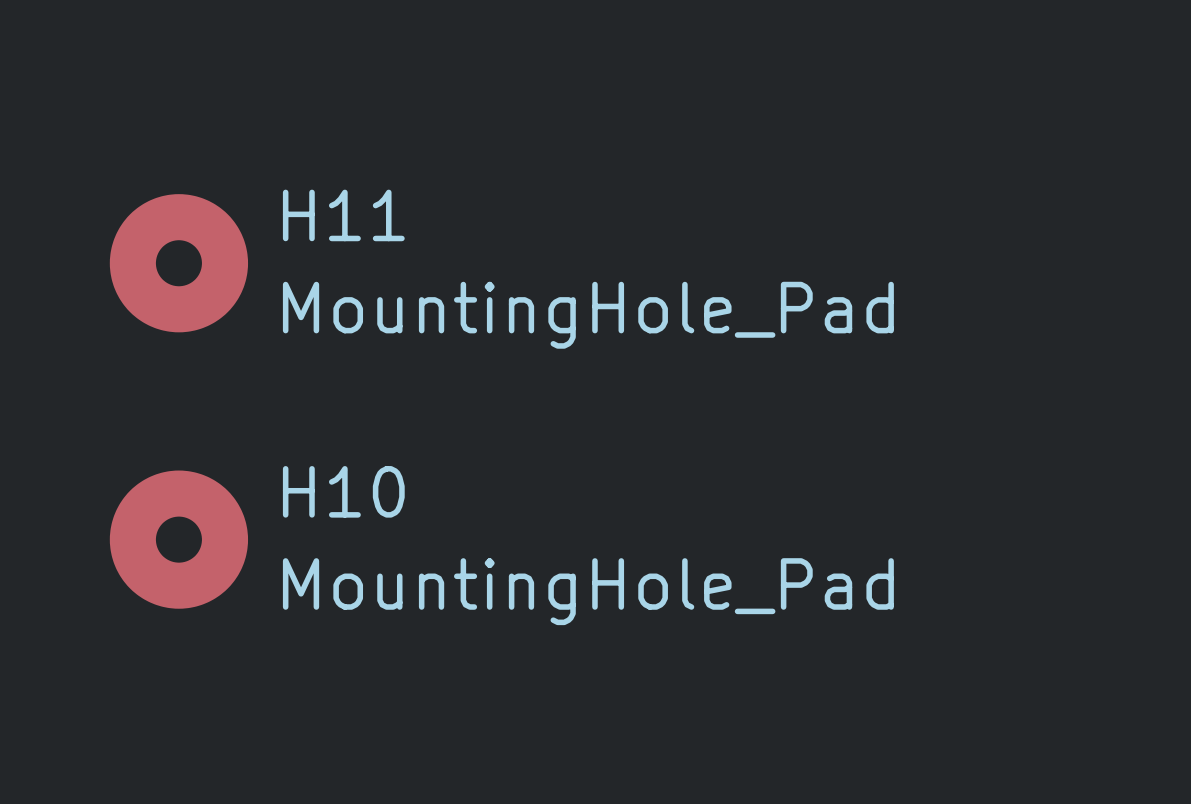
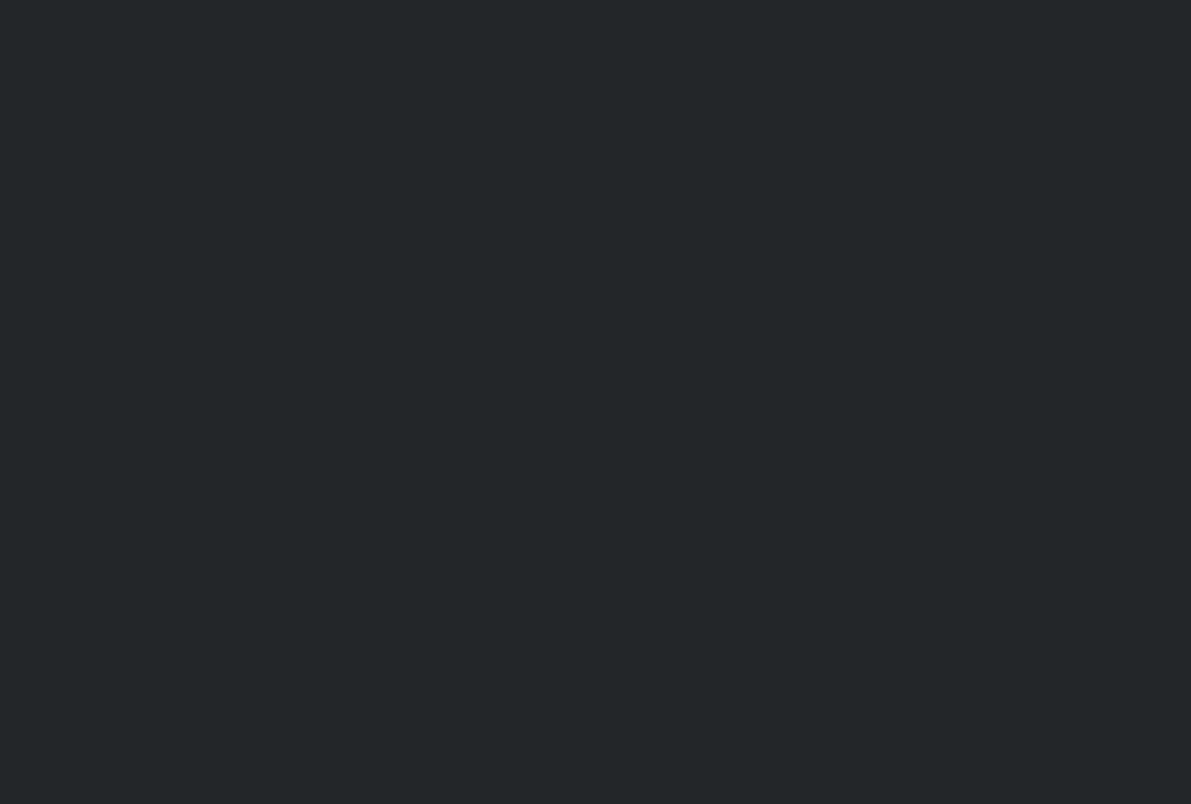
H11: MountingHole_Pad (178, 263) -> none
H10: MountingHole_Pad (178, 539) -> none

